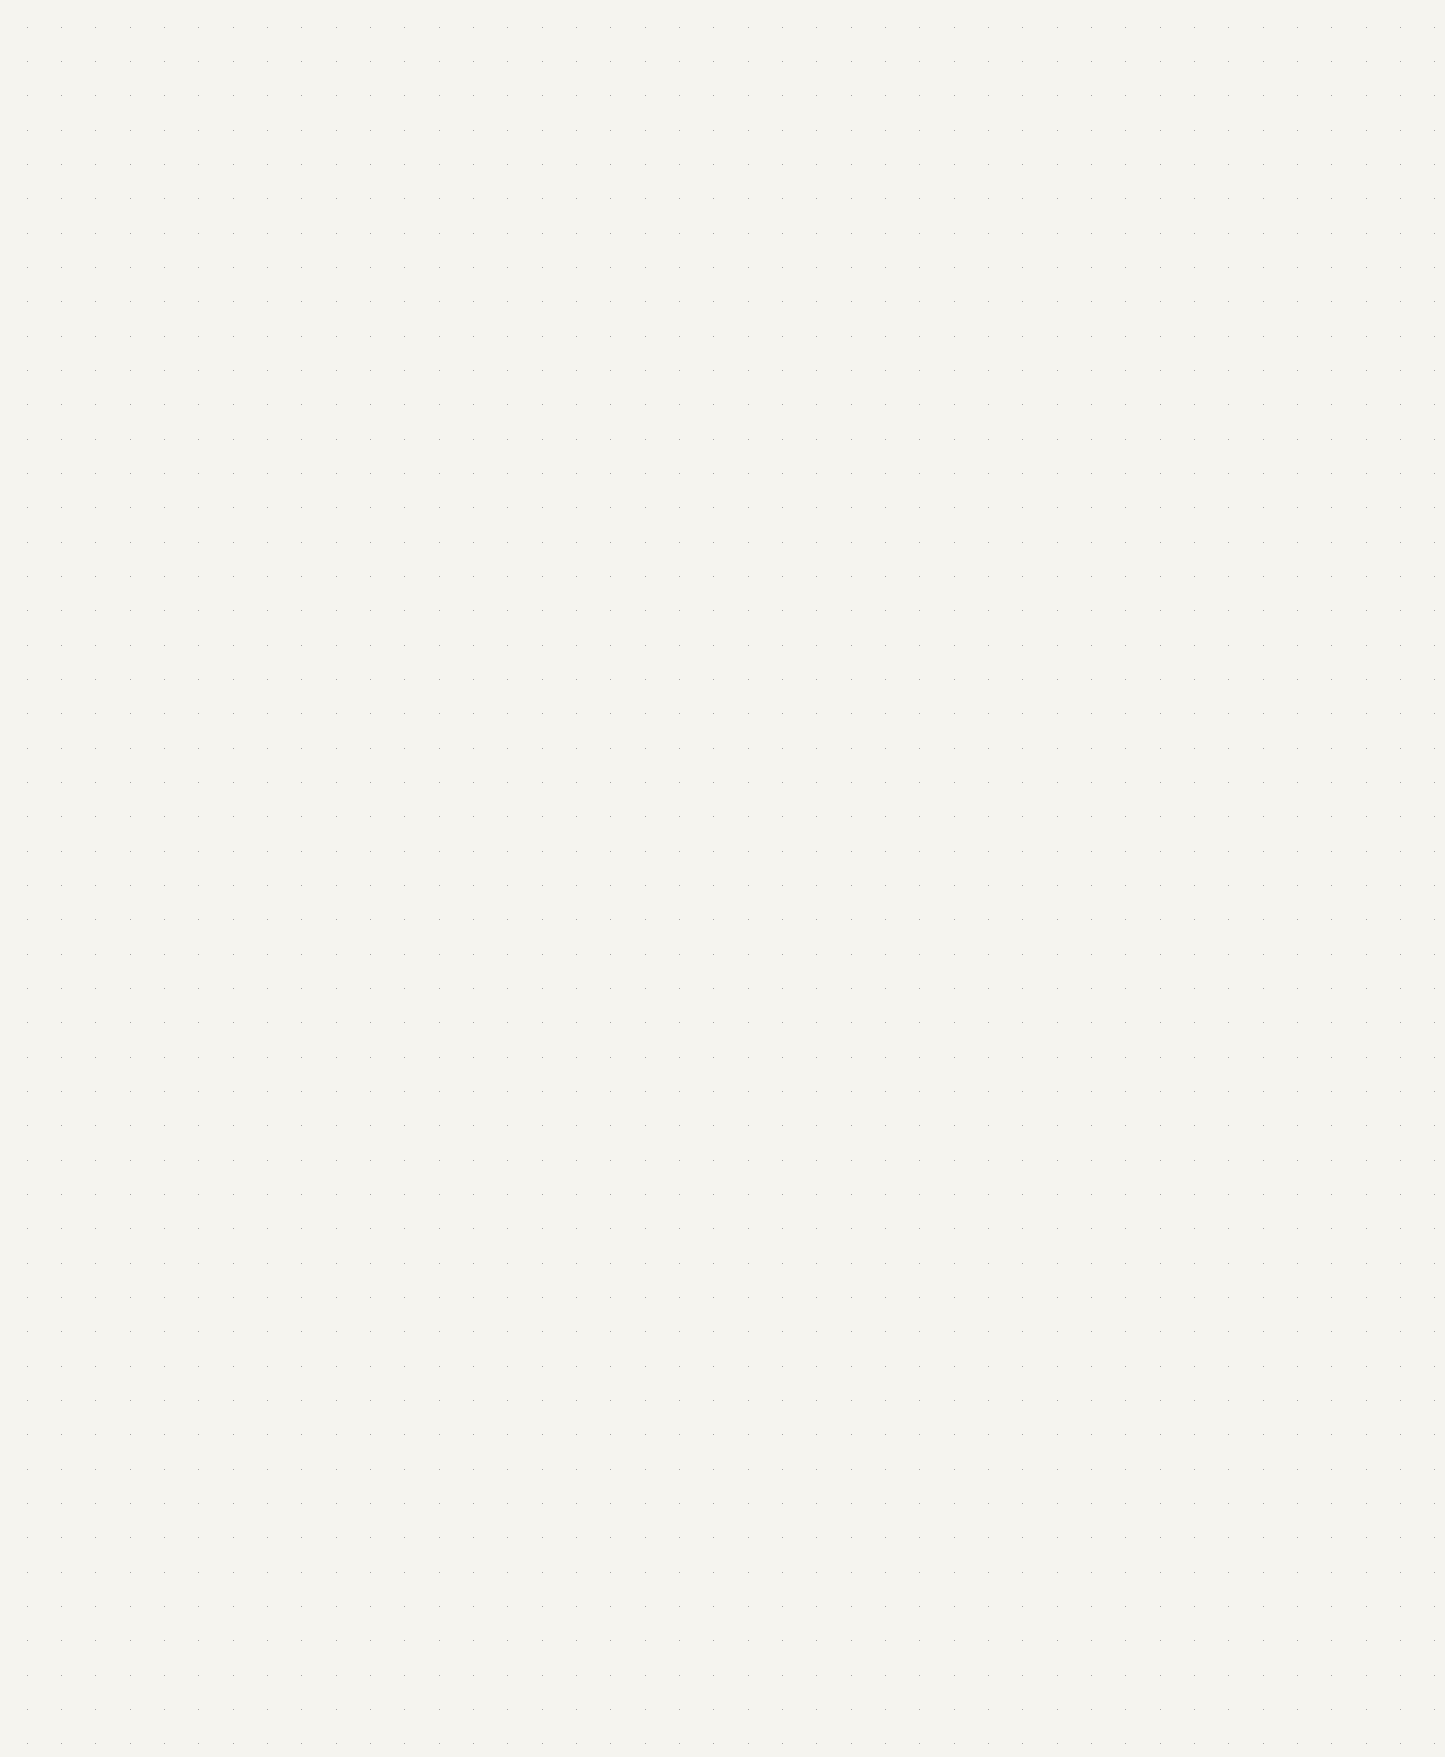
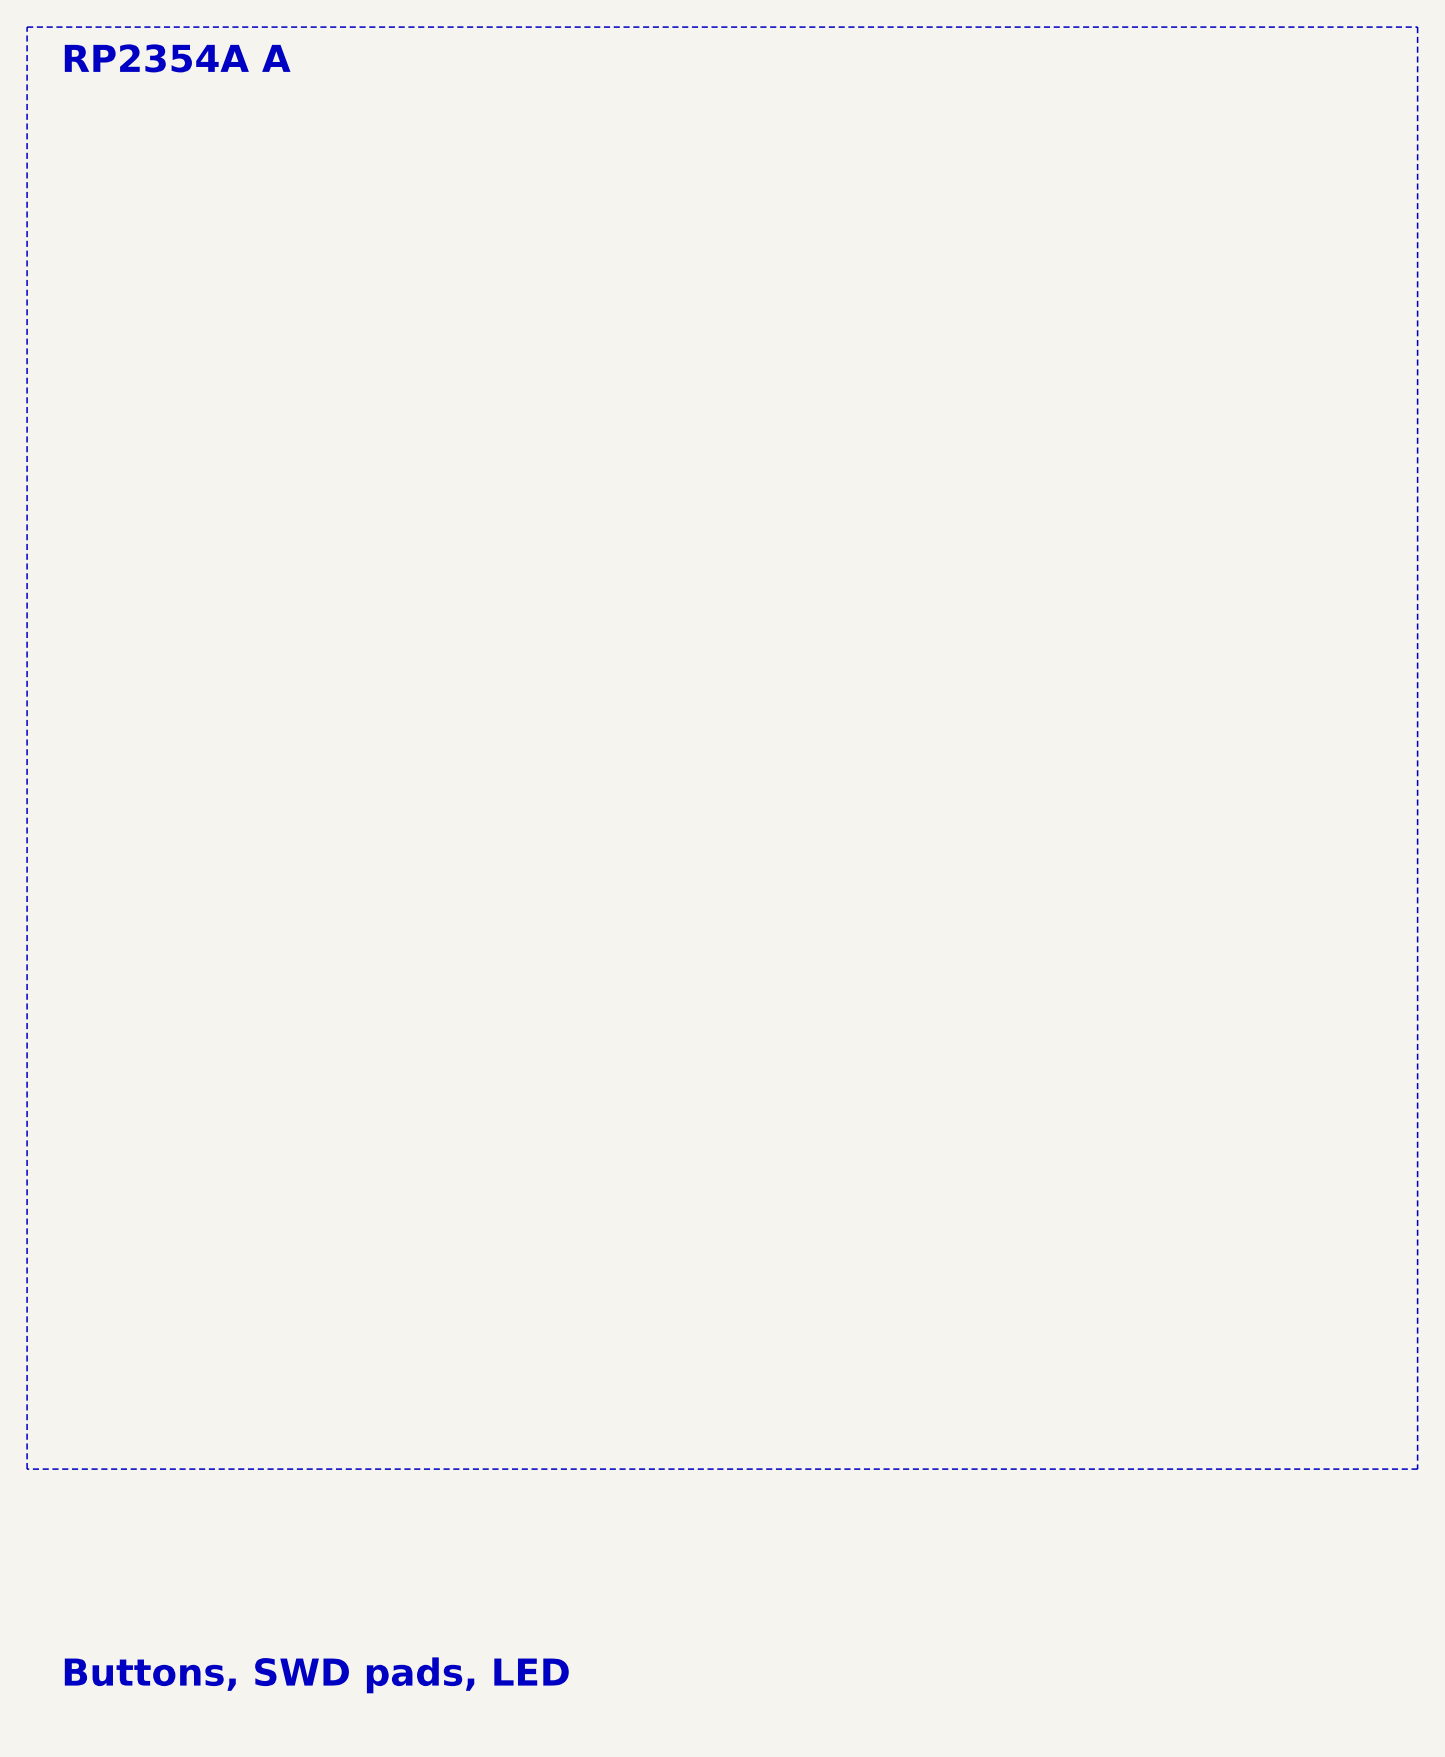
line: none -> (27, 27) (1417, 27) (1417, 1469) (27, 1469) (27, 27)
text: none -> RP2354A A (177, 58)
text: none -> Buttons, SWD pads, LED (316, 1675)

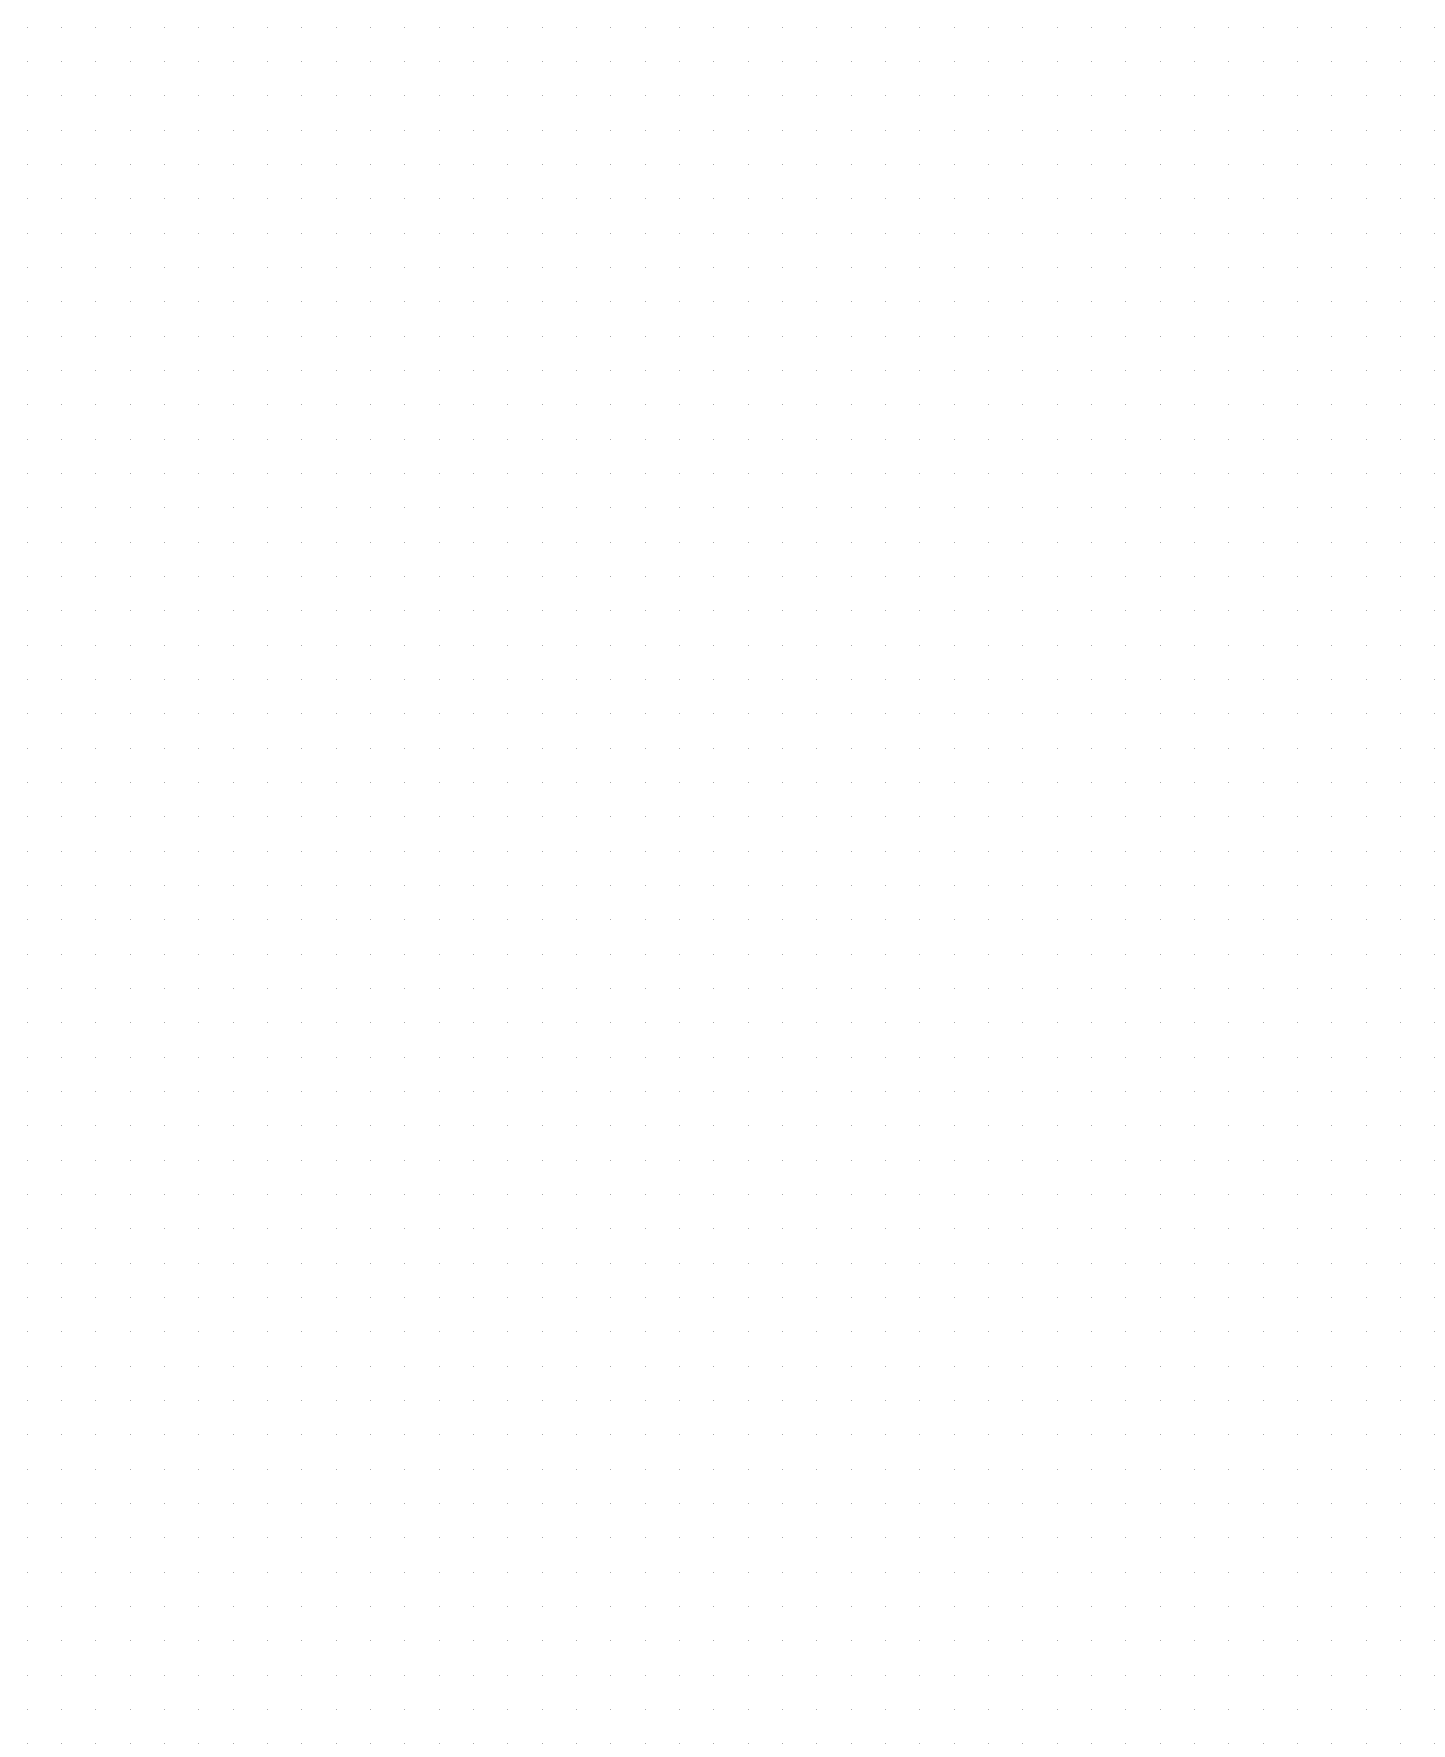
line: (27, 27) (1417, 27) (1417, 1469) (27, 1469) (27, 27) -> none
text: RP2354A A (177, 58) -> none
text: Buttons, SWD pads, LED (316, 1675) -> none

